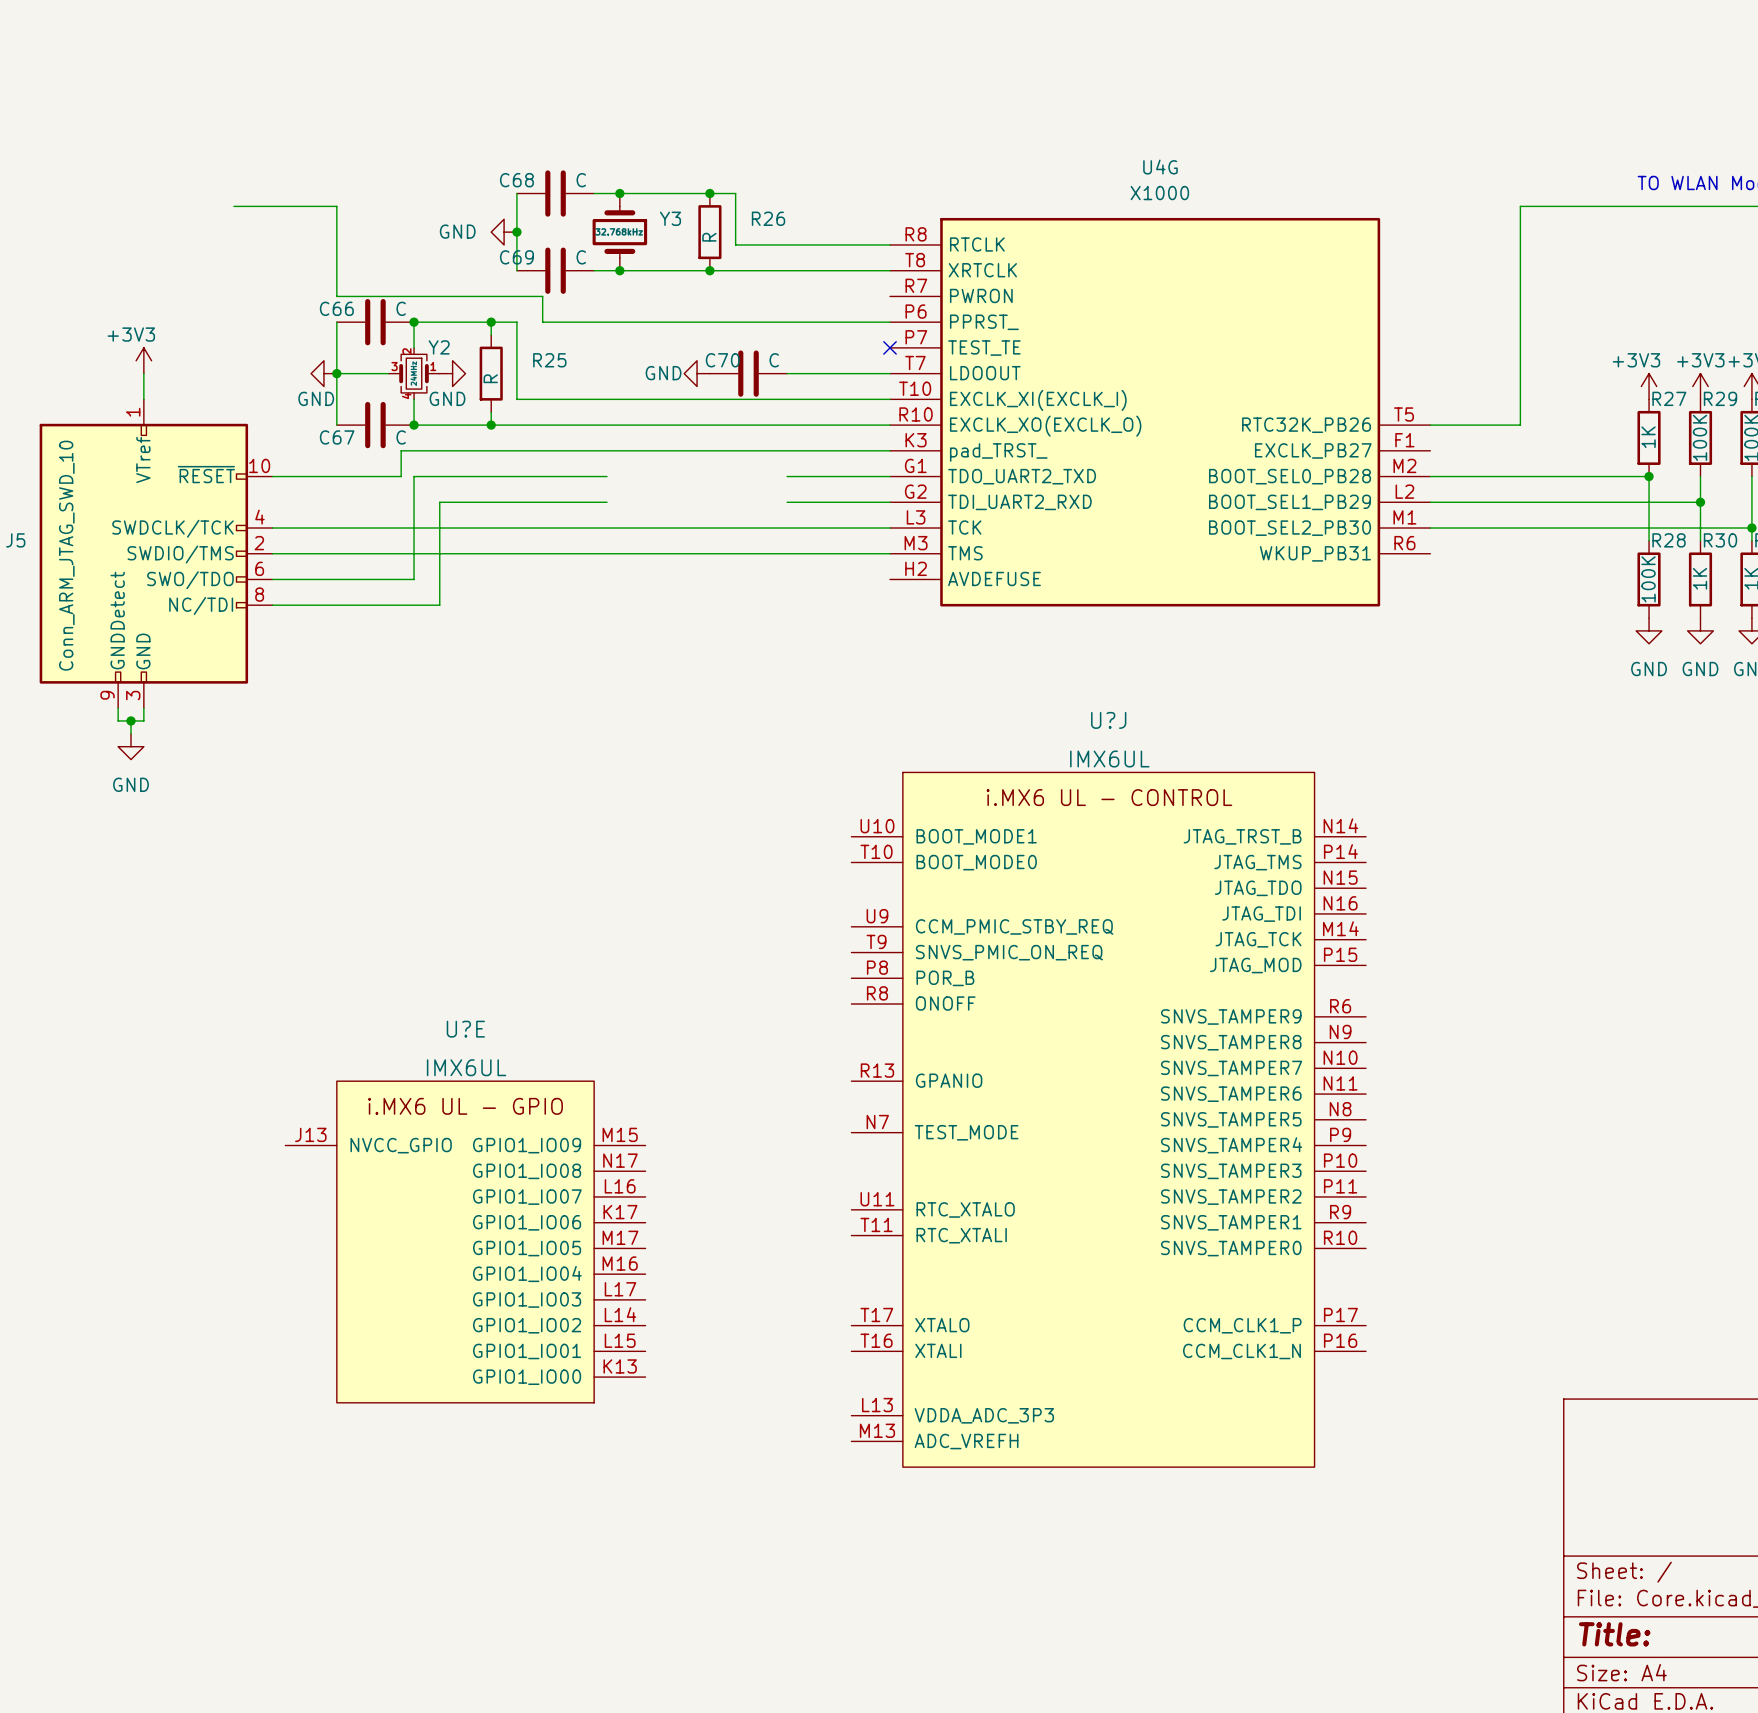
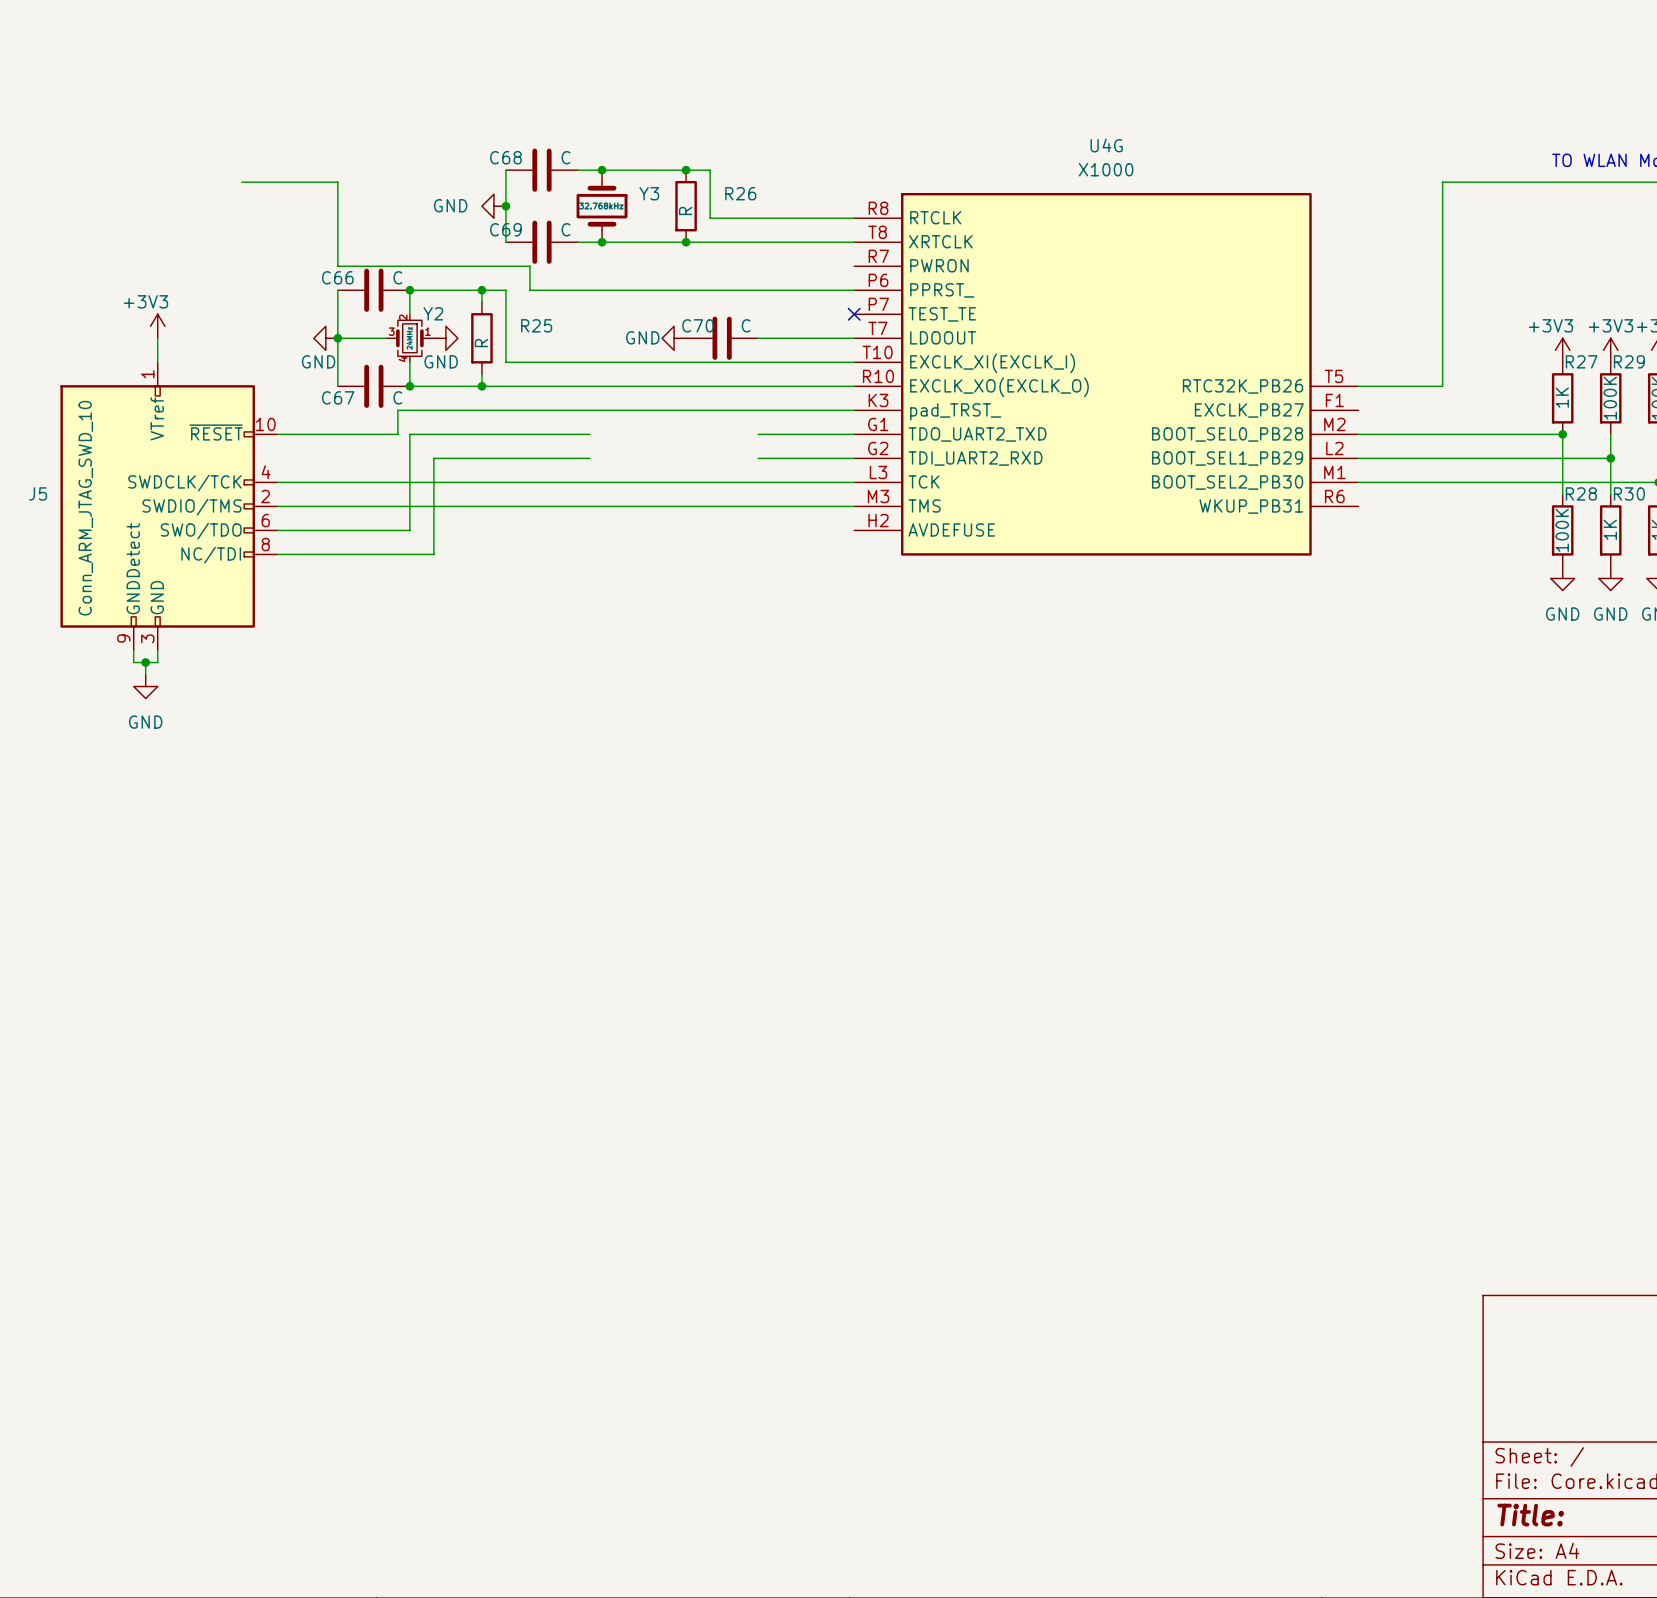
U?J: IMX6UL (1108, 1119) -> none
U?E: IMX6UL (465, 1241) -> none

